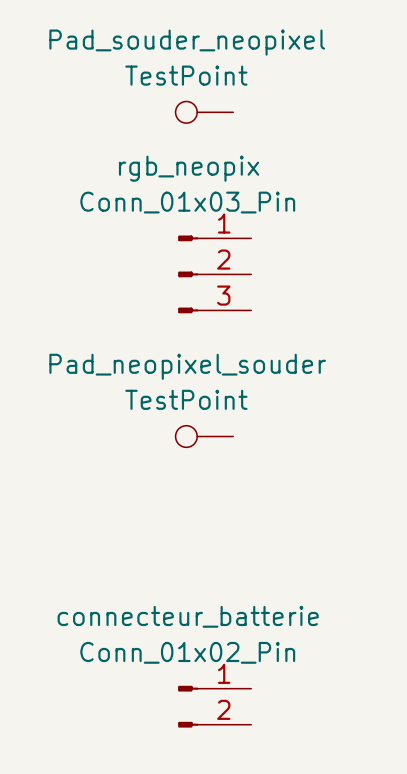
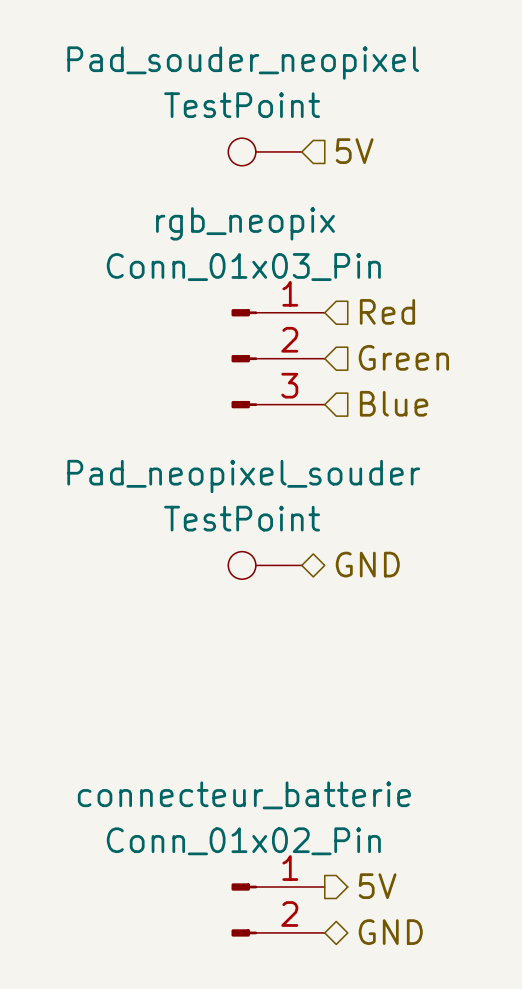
hierarchical label: none -> 5V (354, 151)
hierarchical label: none -> Red (387, 311)
hierarchical label: none -> Green (403, 357)
hierarchical label: none -> Blue (394, 403)
hierarchical label: none -> GND (367, 564)
hierarchical label: none -> 5V (377, 886)
hierarchical label: none -> GND (390, 932)

